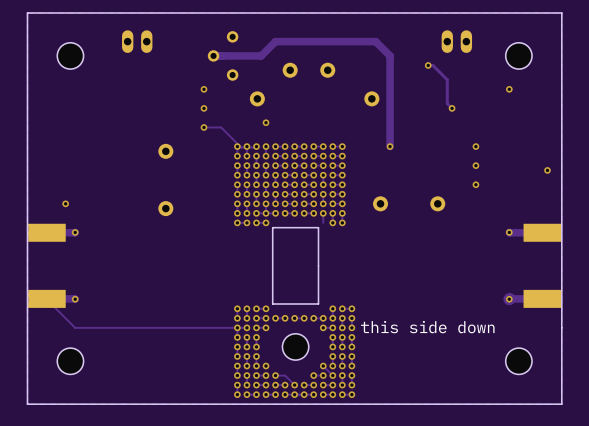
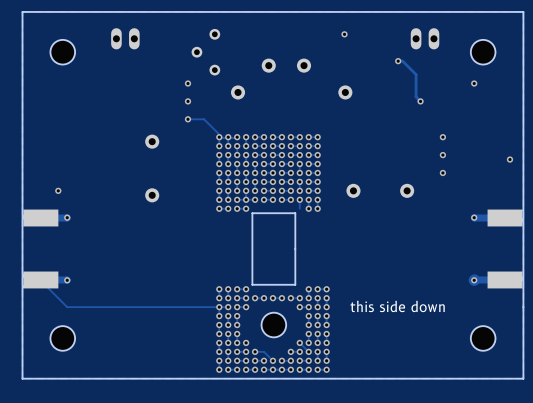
via: none -> (344, 34)
track: (213, 55) (261, 55) (275, 41) (375, 41) (390, 55) (390, 146) -> none
via: (266, 122) -> none
via: (390, 146) -> none

